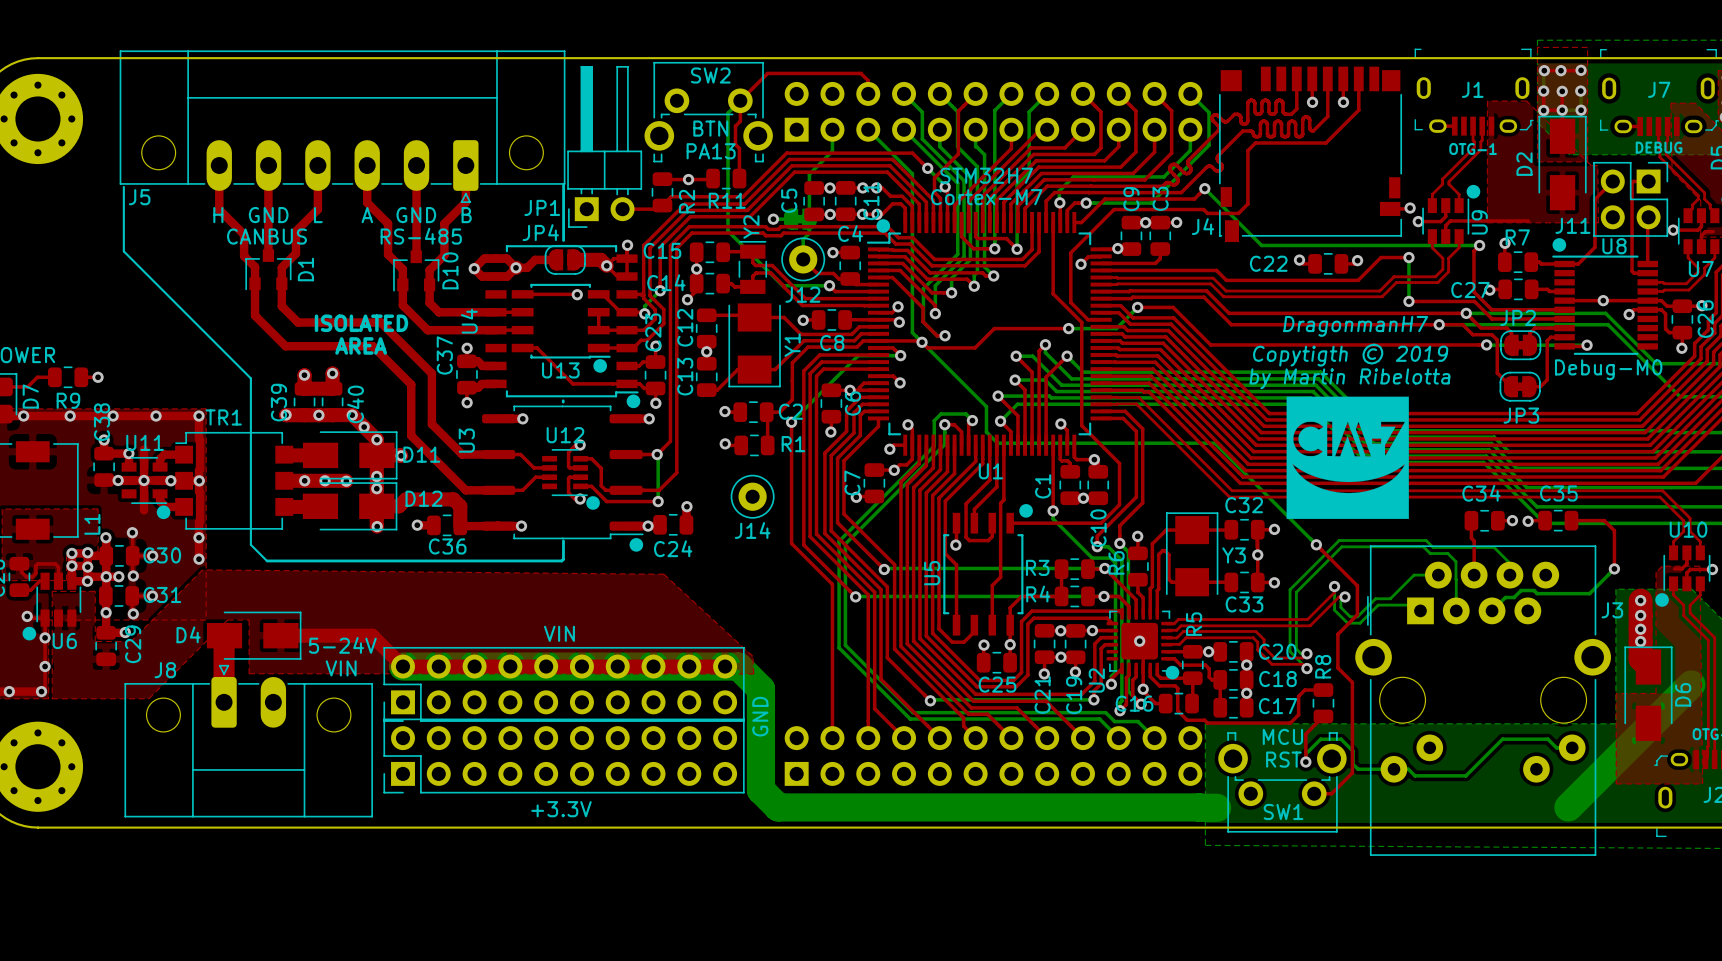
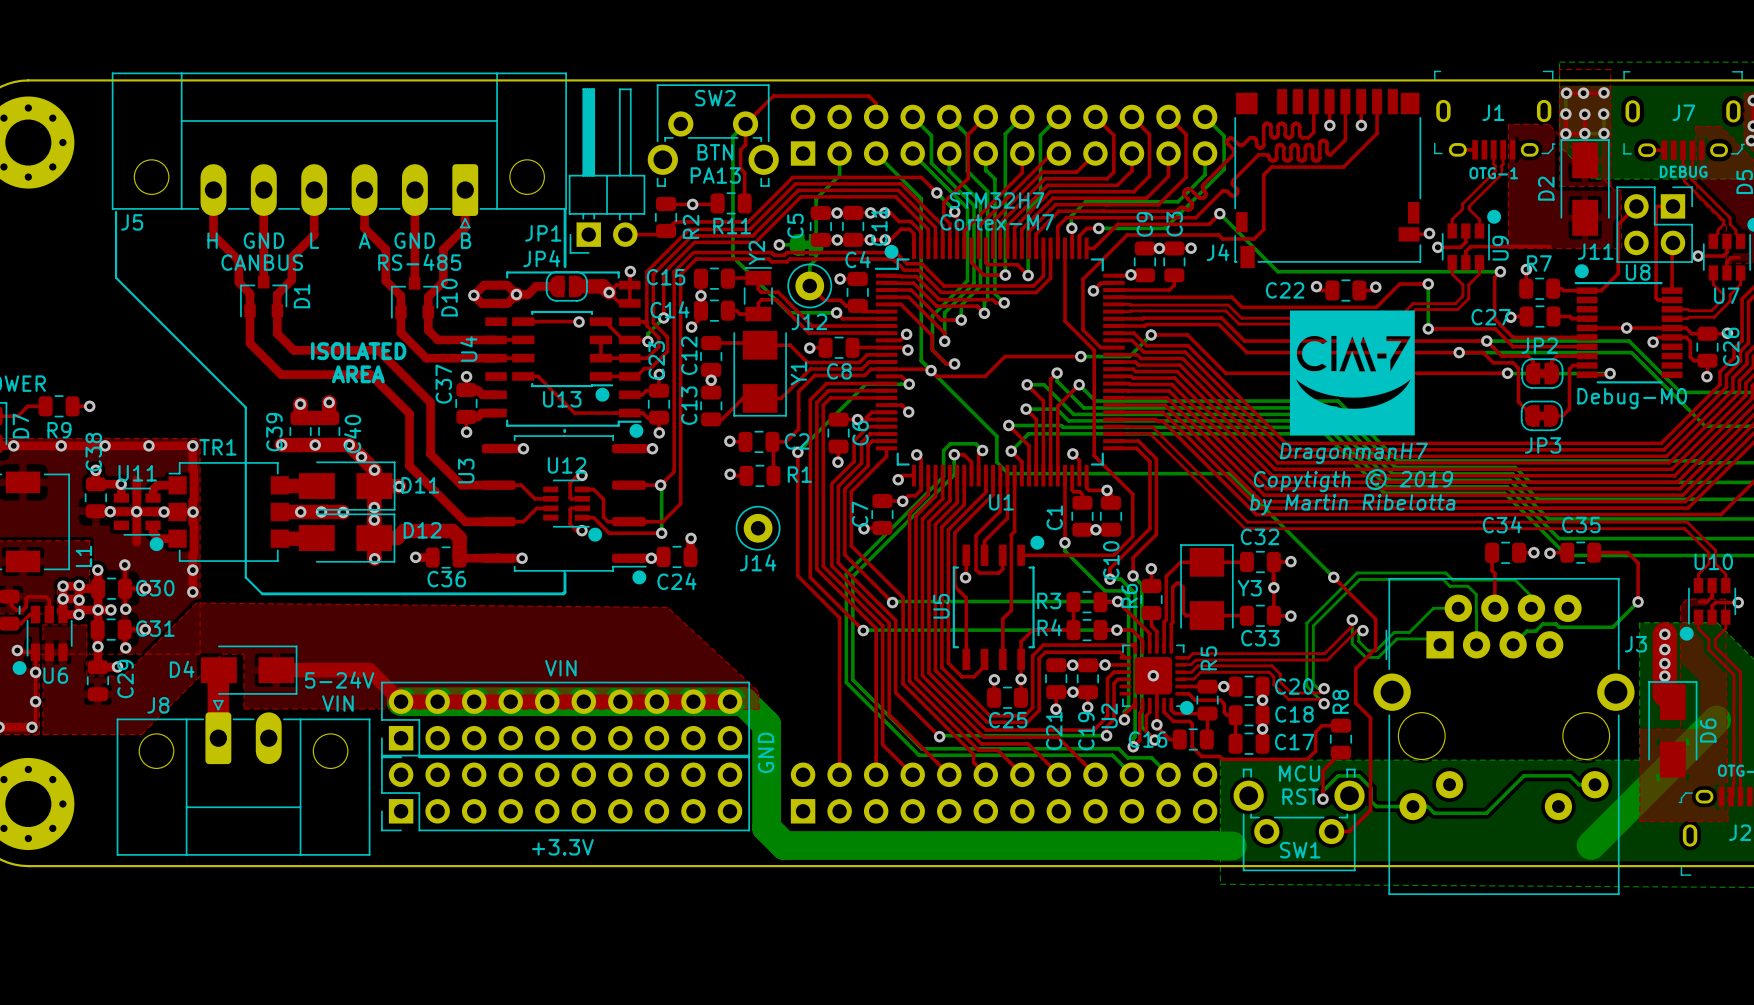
text position: DragonmanH7 (1355, 326) -> DragonmanH7 (1353, 453)
text position: Copytigth © 2019 (1350, 355) -> Copytigth © 2019 (1353, 480)
text position: by Martin Ribelotta (1350, 378) -> by Martin Ribelotta (1352, 504)
drawing position: (1347, 457) -> (1352, 372)

